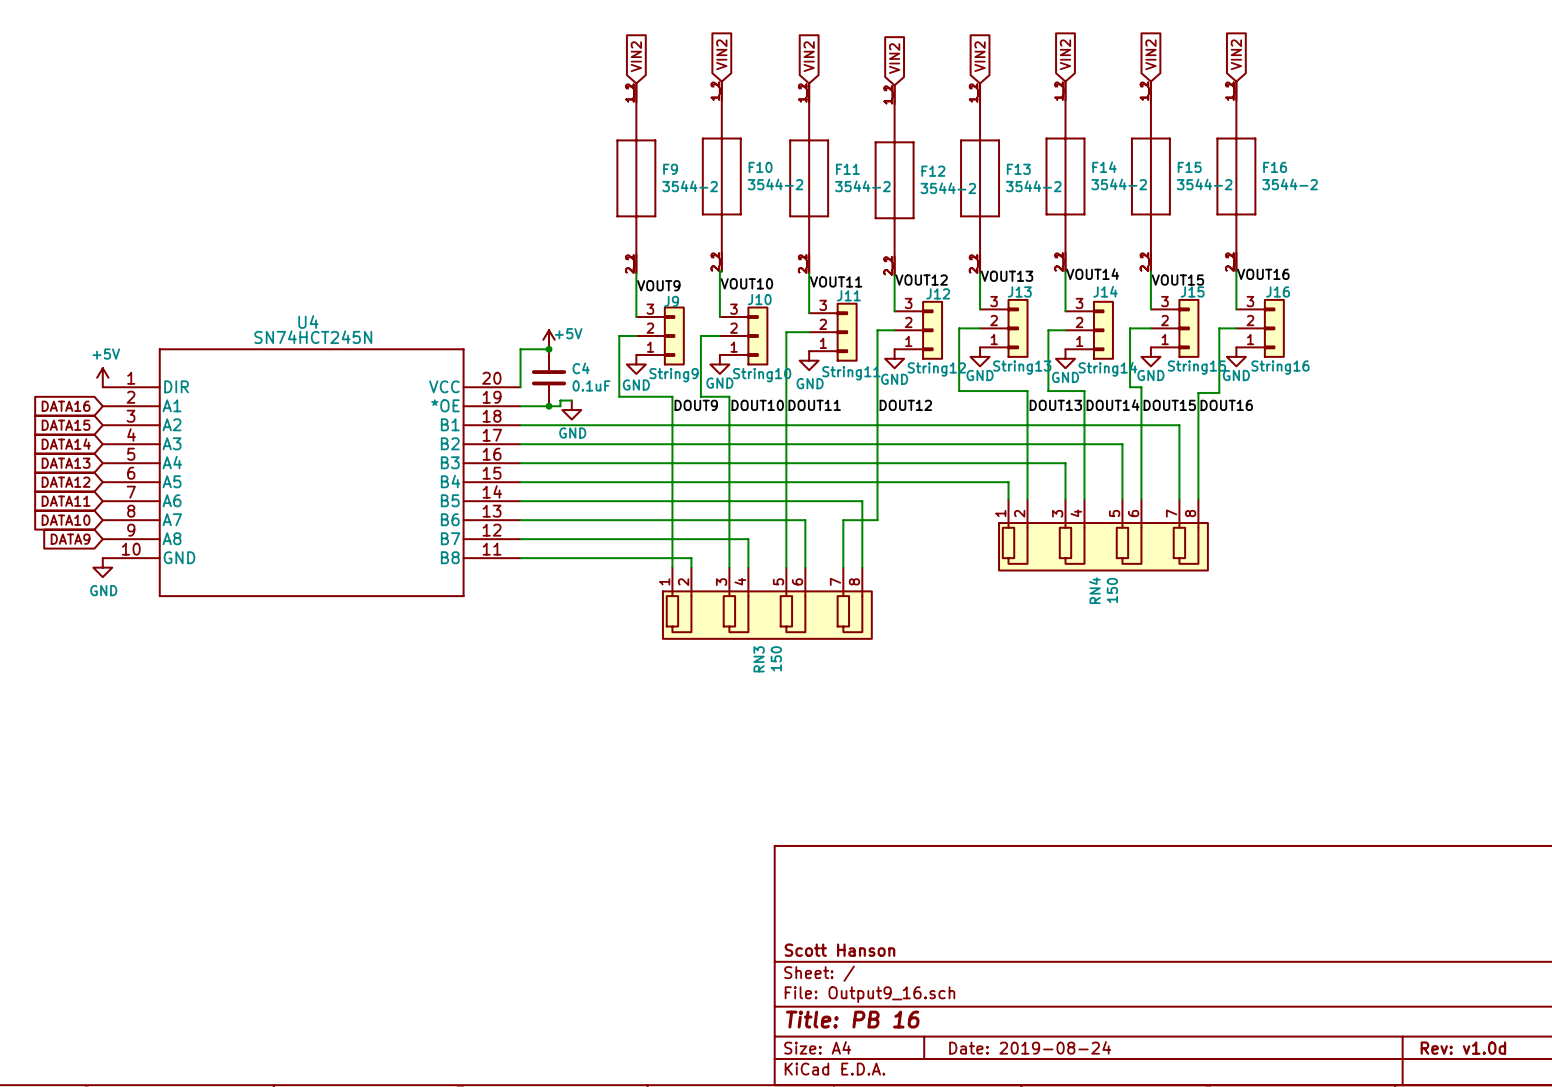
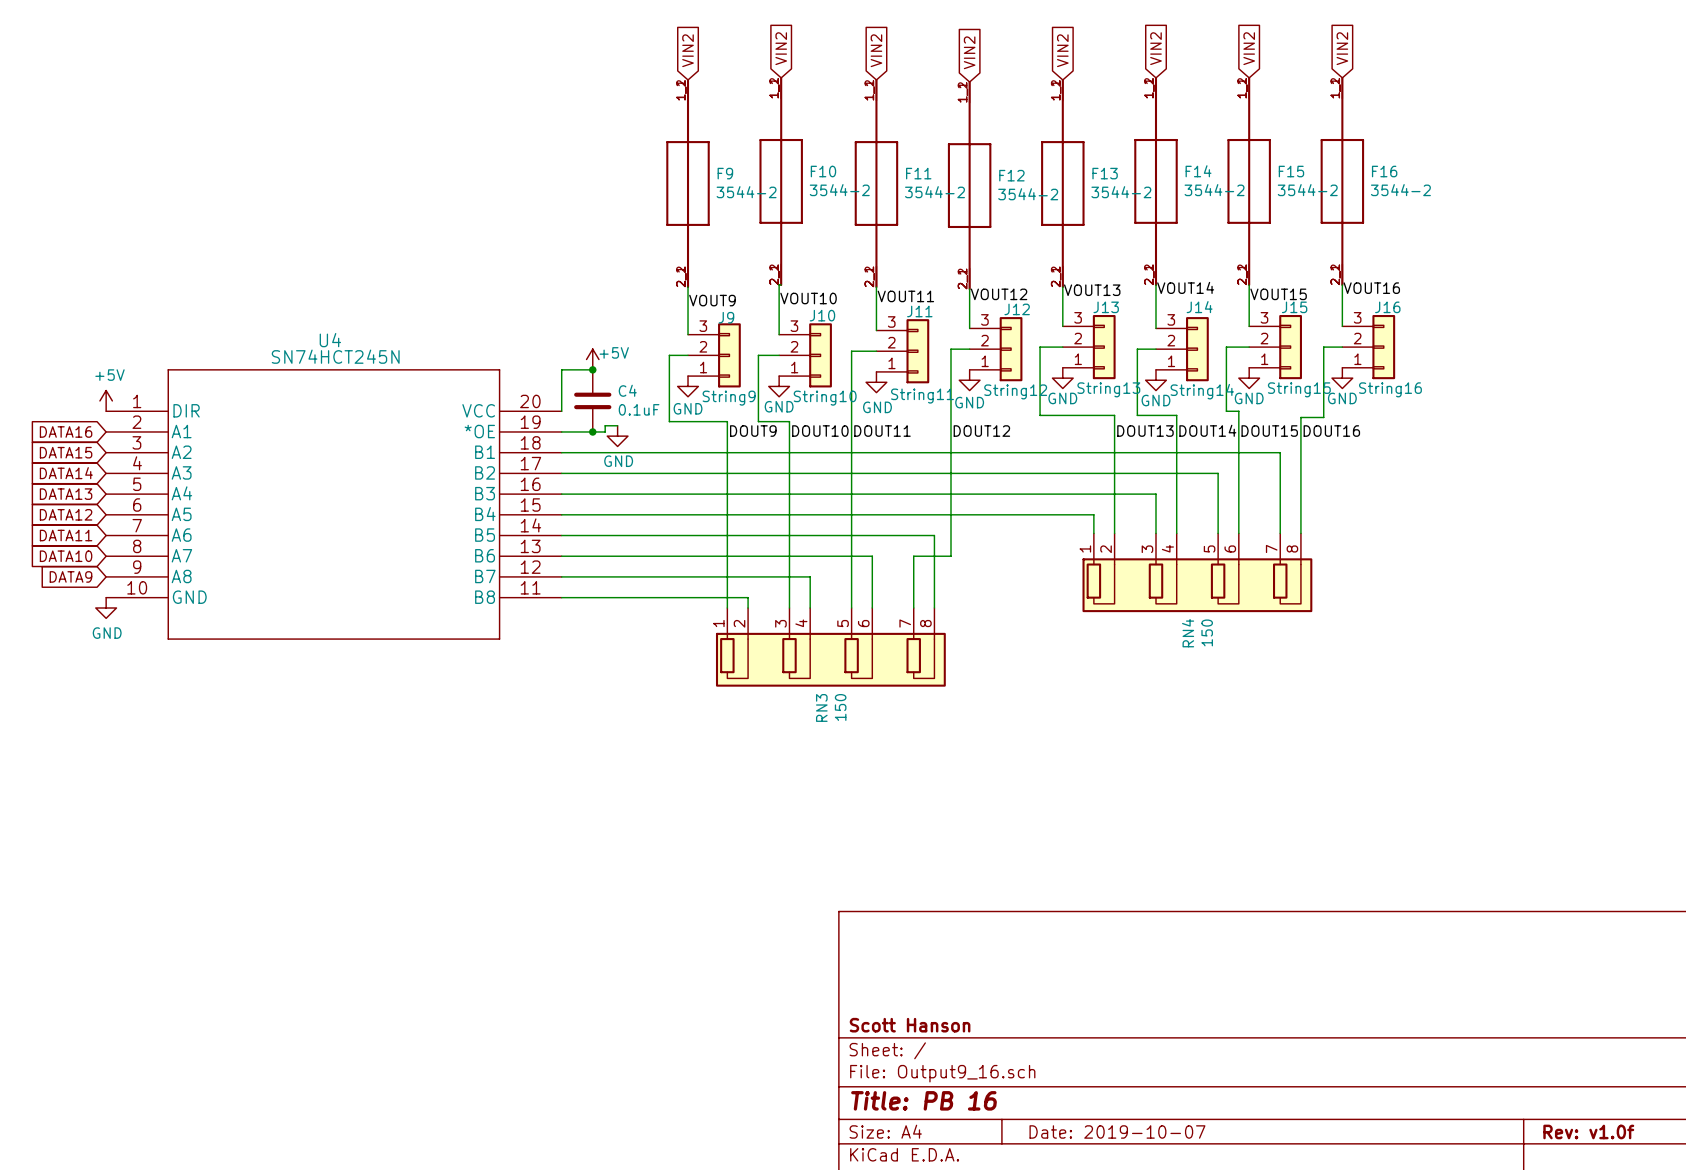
title block: Date: 2019-08-24 (1030, 1047) -> Date: 2019-10-07 (1117, 1131)
title block: Rev: v1.0d (1463, 1048) -> Rev: v1.0f (1588, 1131)

